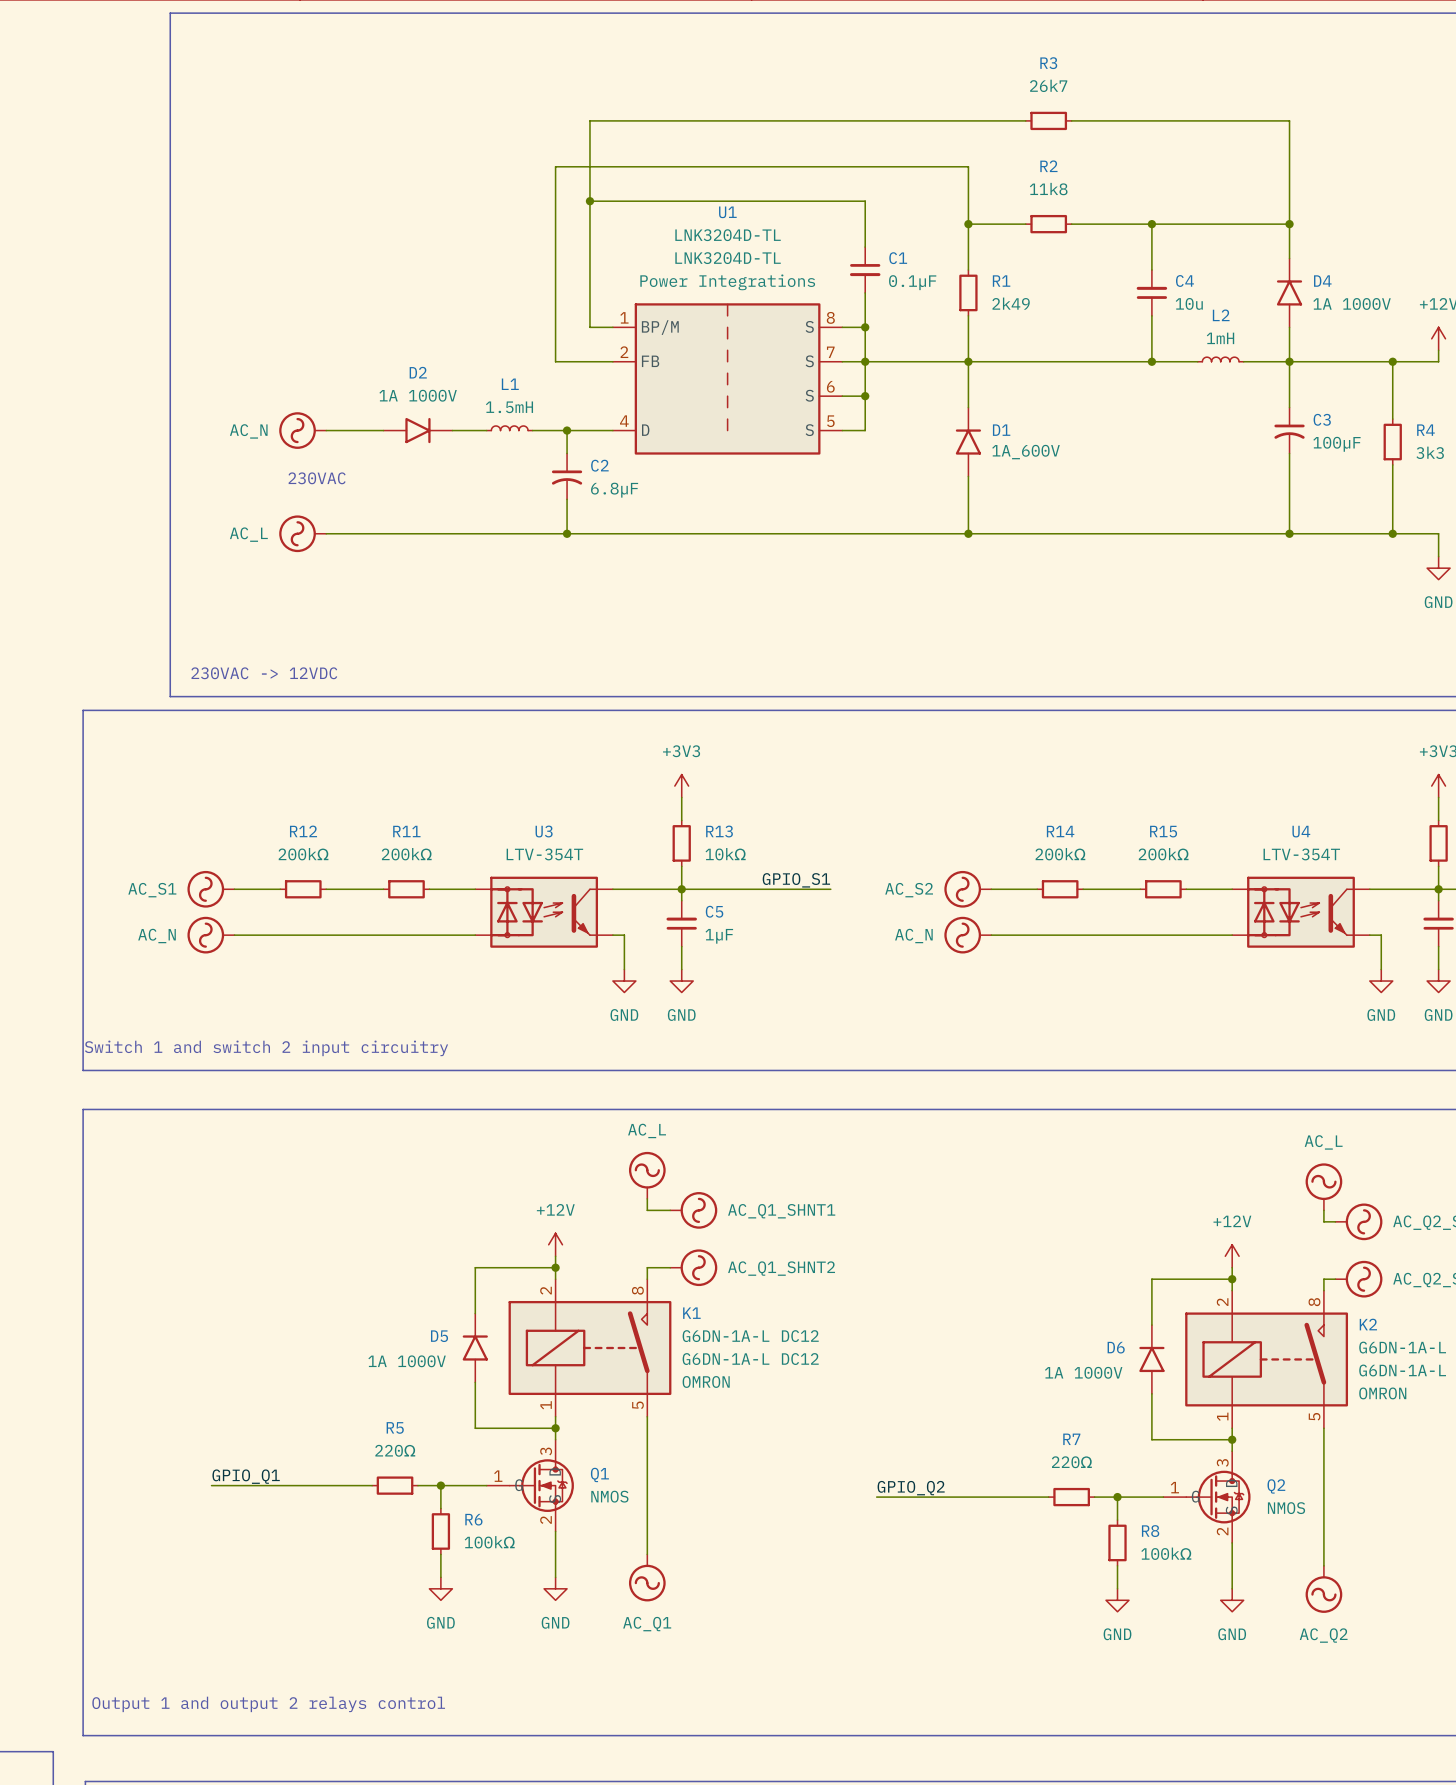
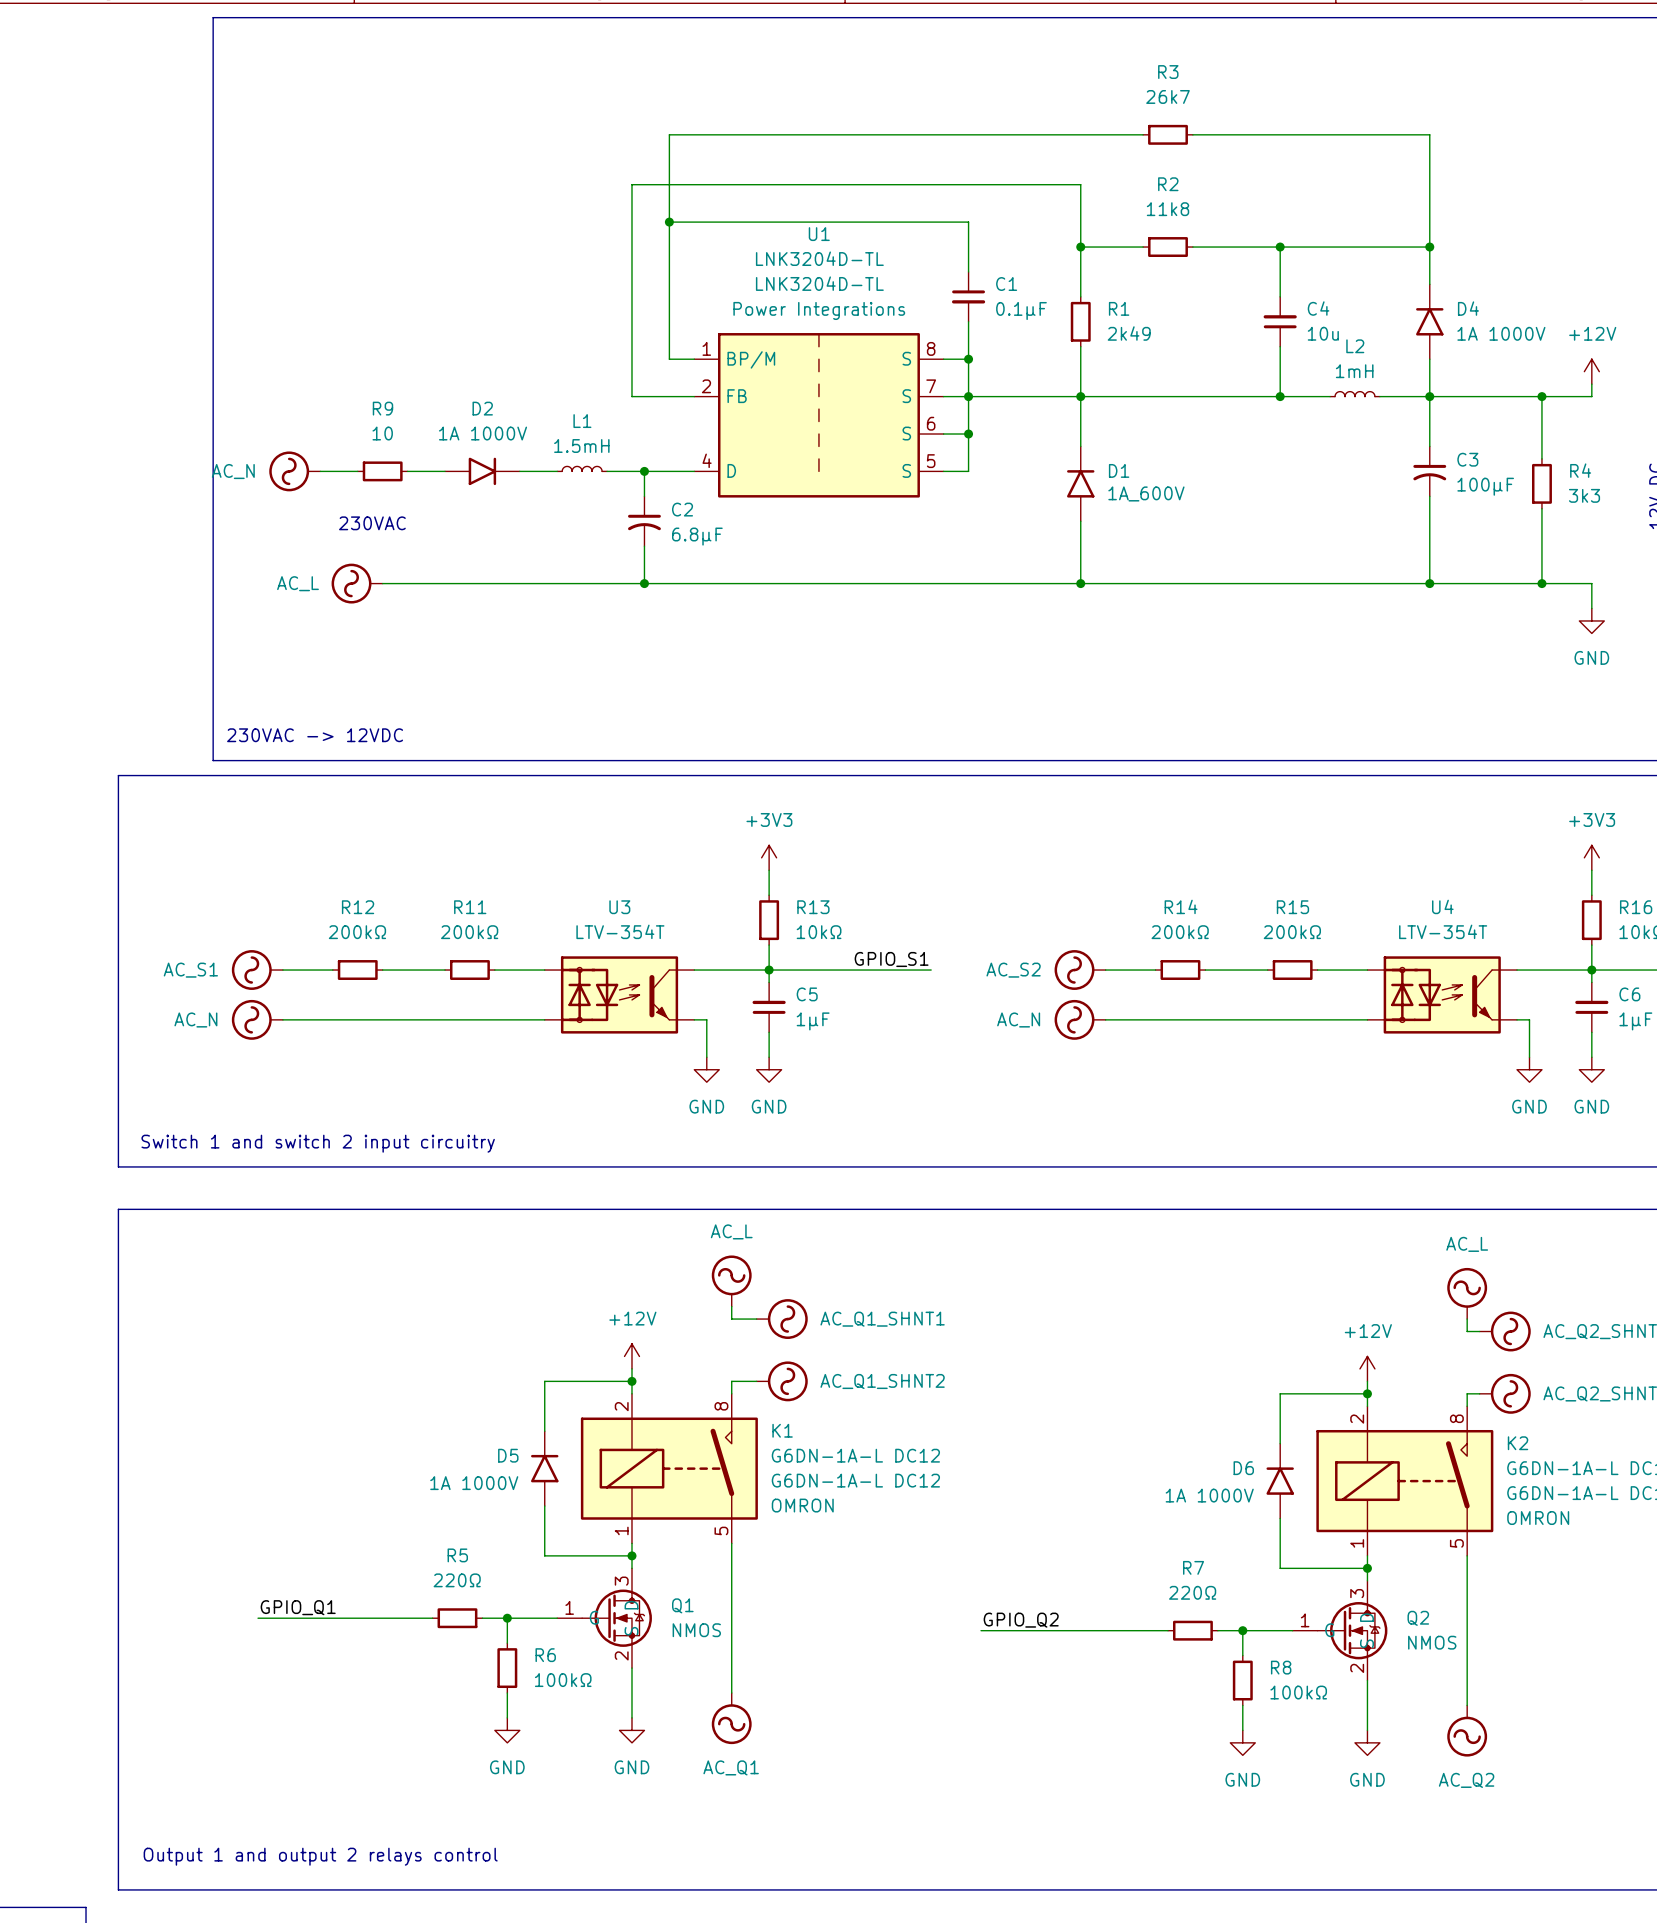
wire: none -> (320, 471) (357, 471)
power symbol position: AC_N (302, 430) -> AC_N (294, 471)
wire: (326, 430) (349, 430) -> none
R9: none -> (382, 471)

